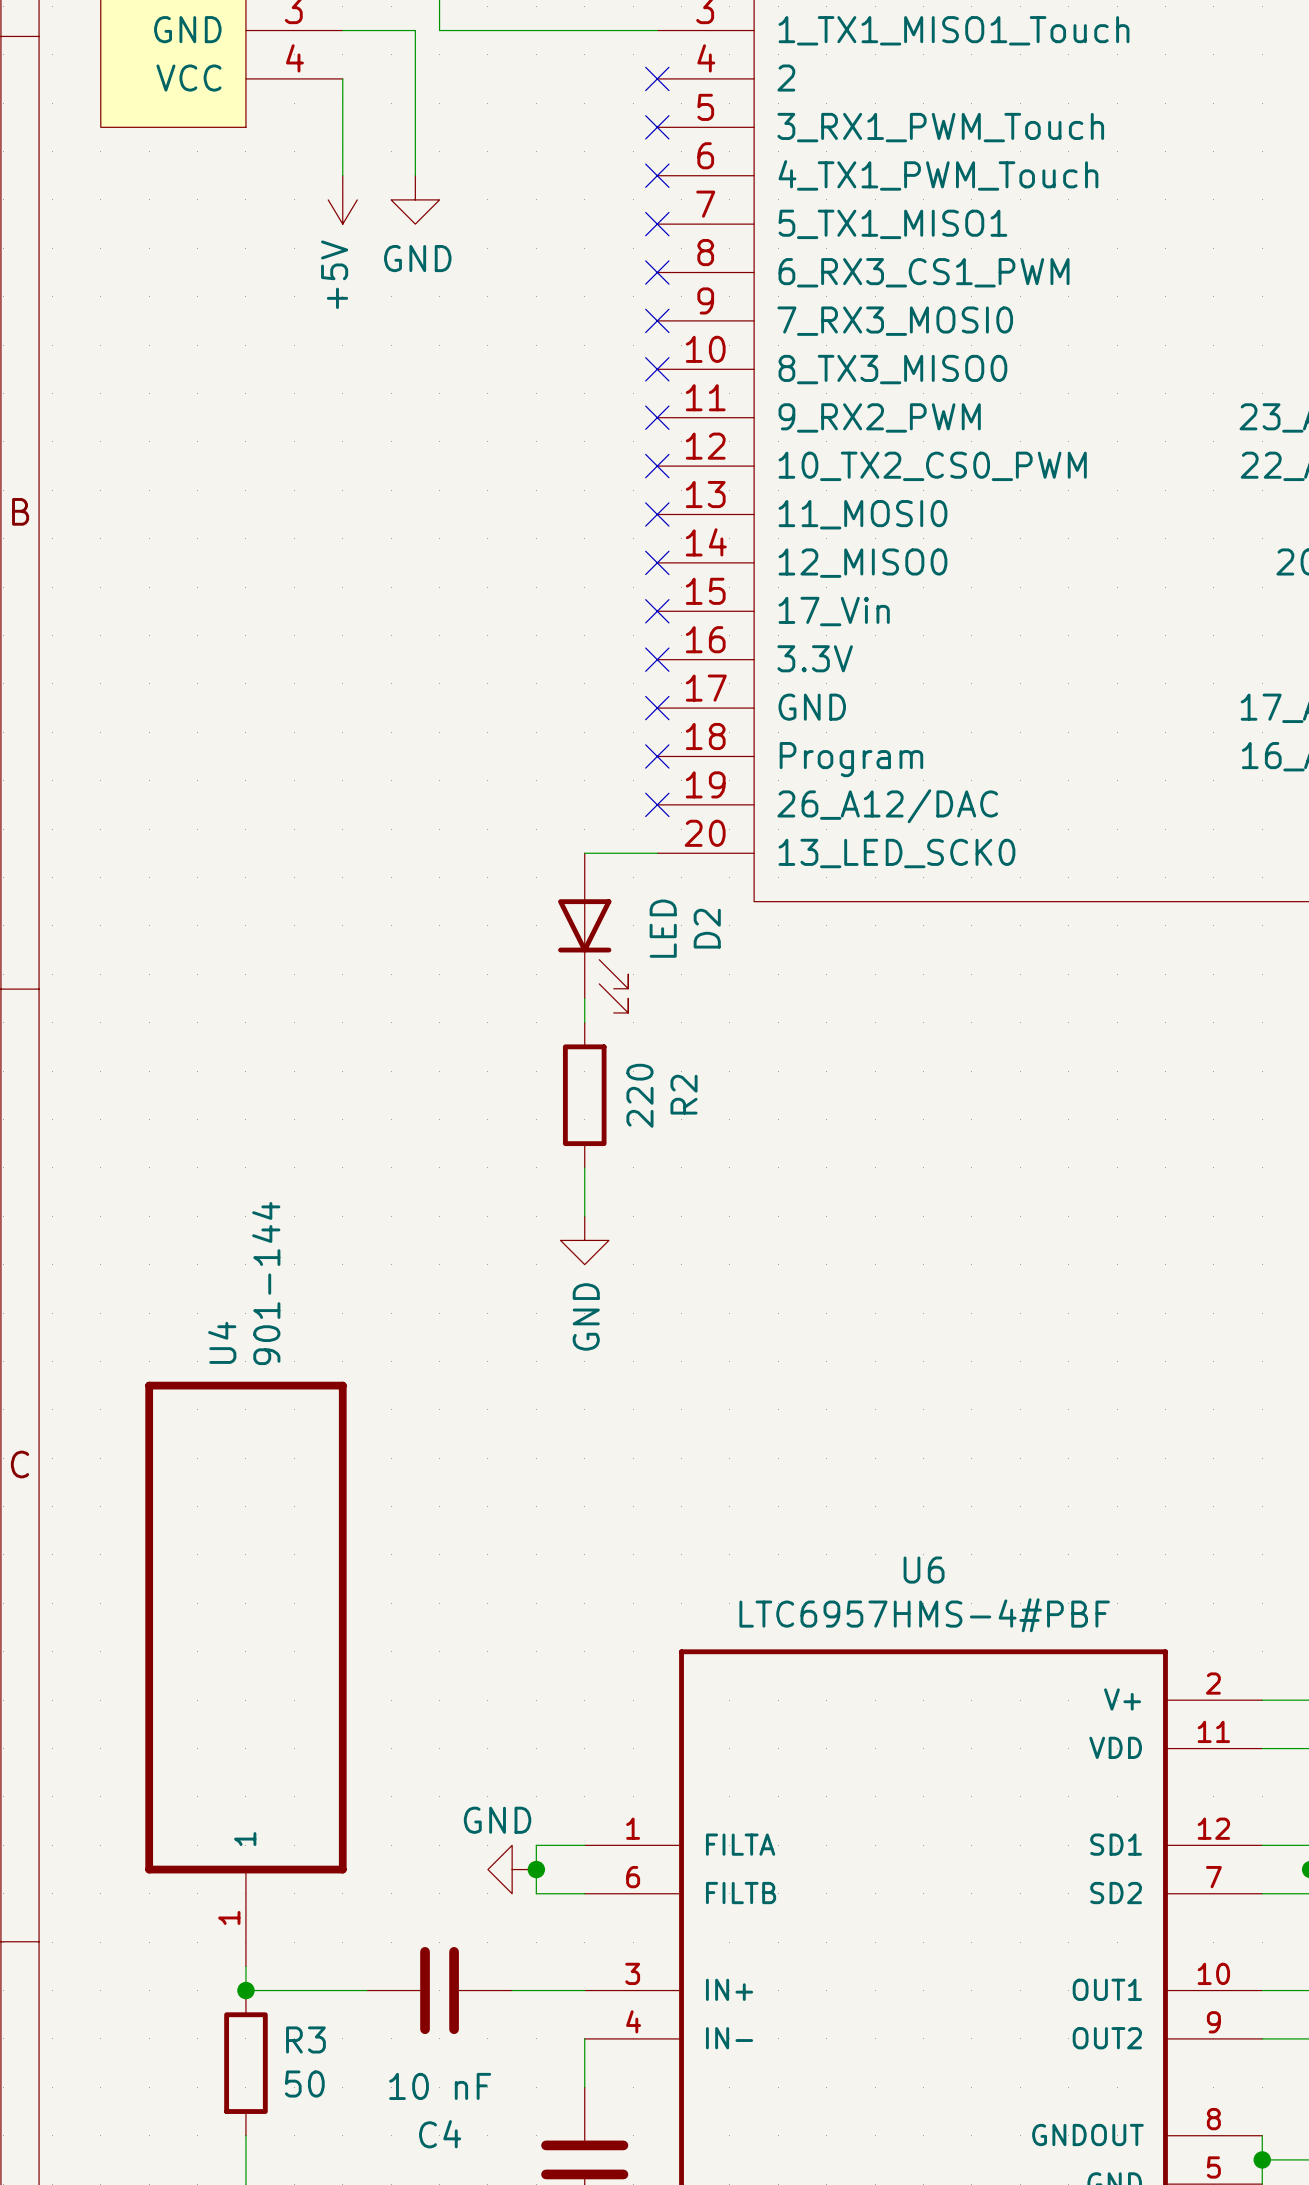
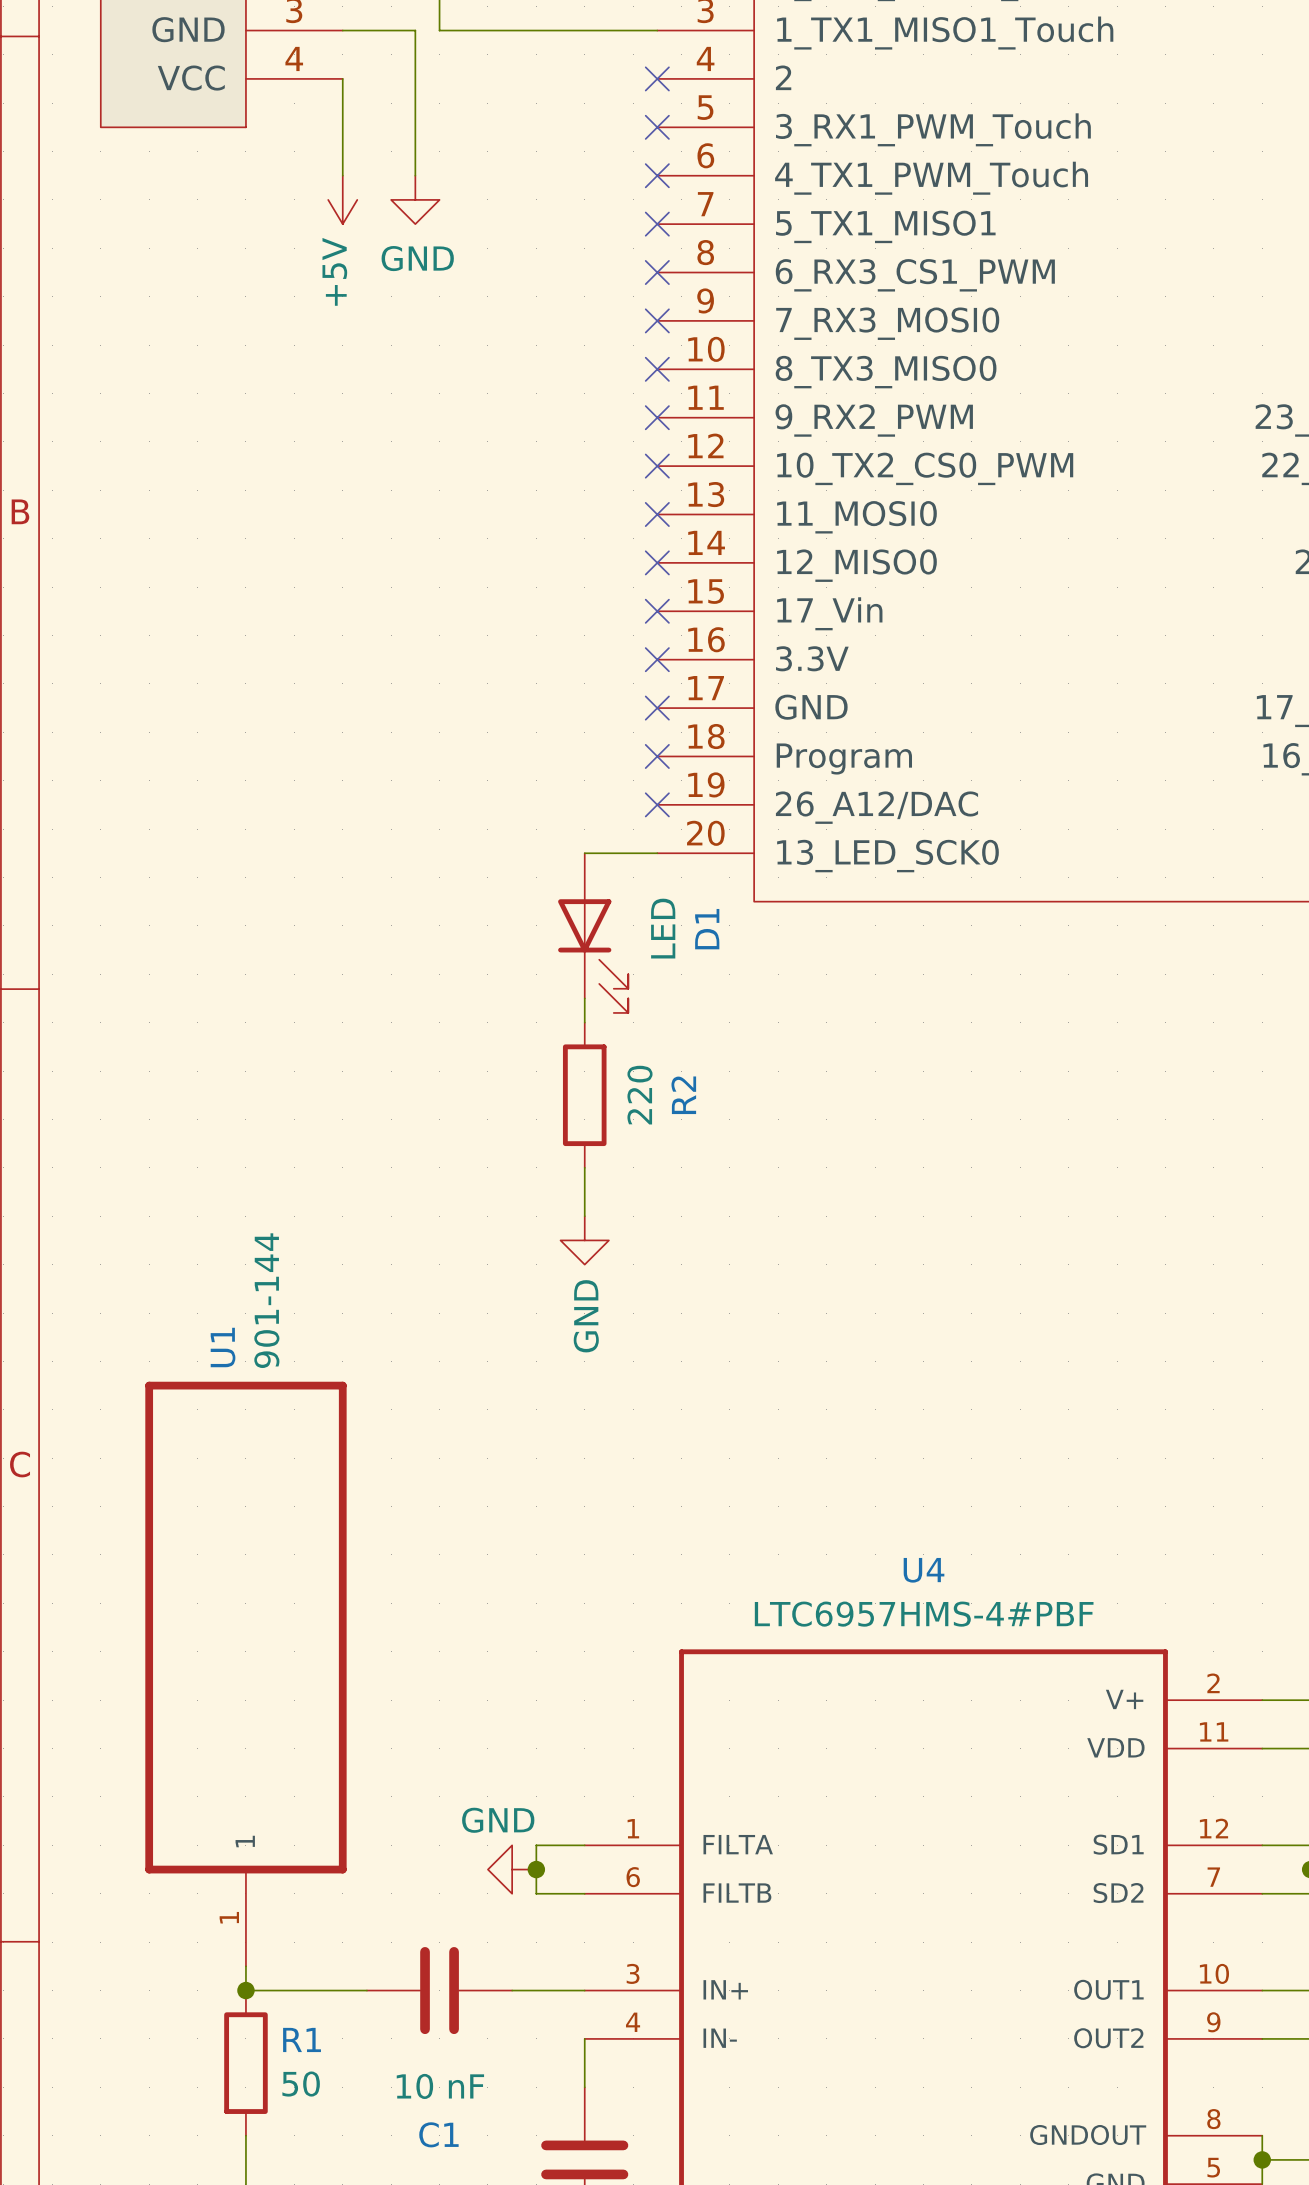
D2 name: D2 (707, 928) -> D1 (707, 929)
U4 name: U4 (222, 1342) -> U1 (223, 1347)
U6 name: U6 (924, 1570) -> U4 (924, 1570)
R3 name: R3 (305, 2039) -> R1 (302, 2039)
C4 name: C4 (440, 2134) -> C1 (438, 2134)

